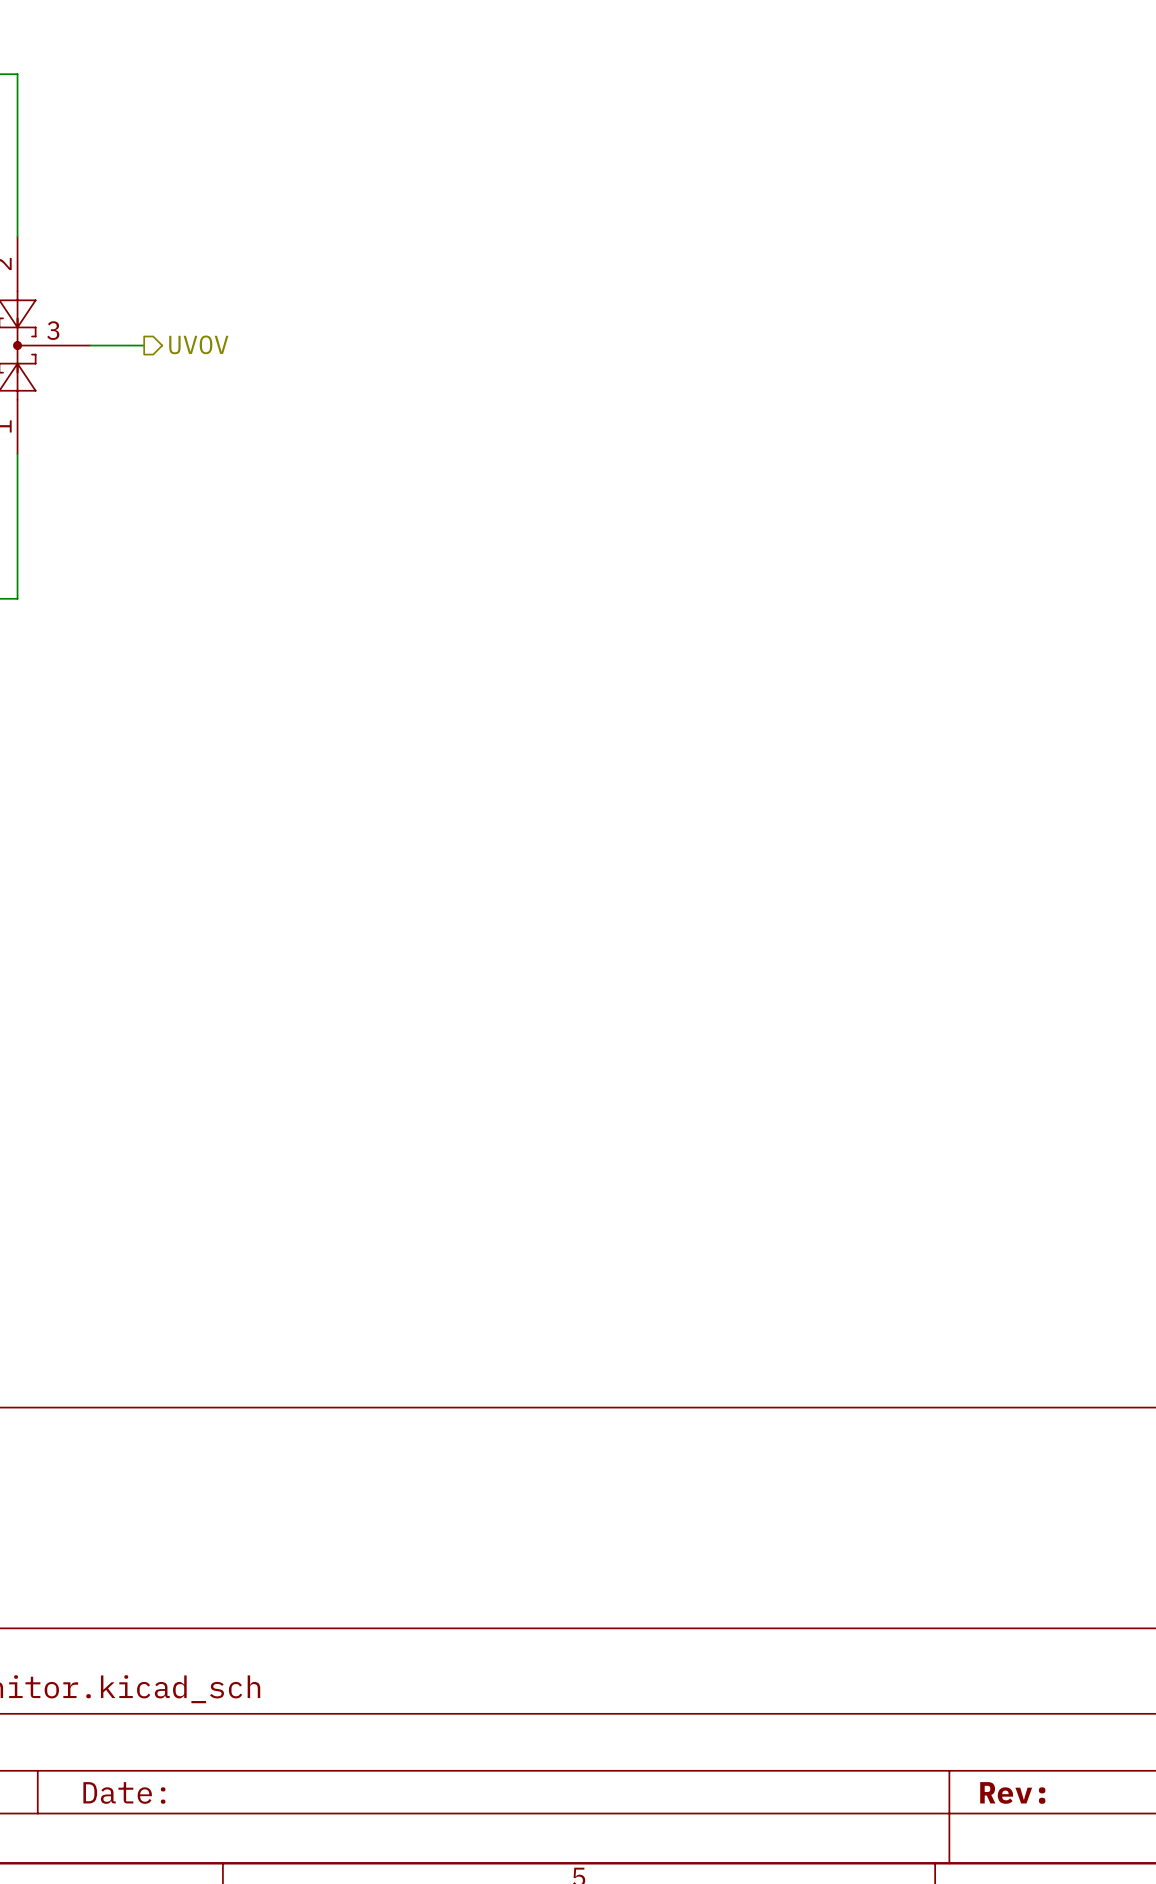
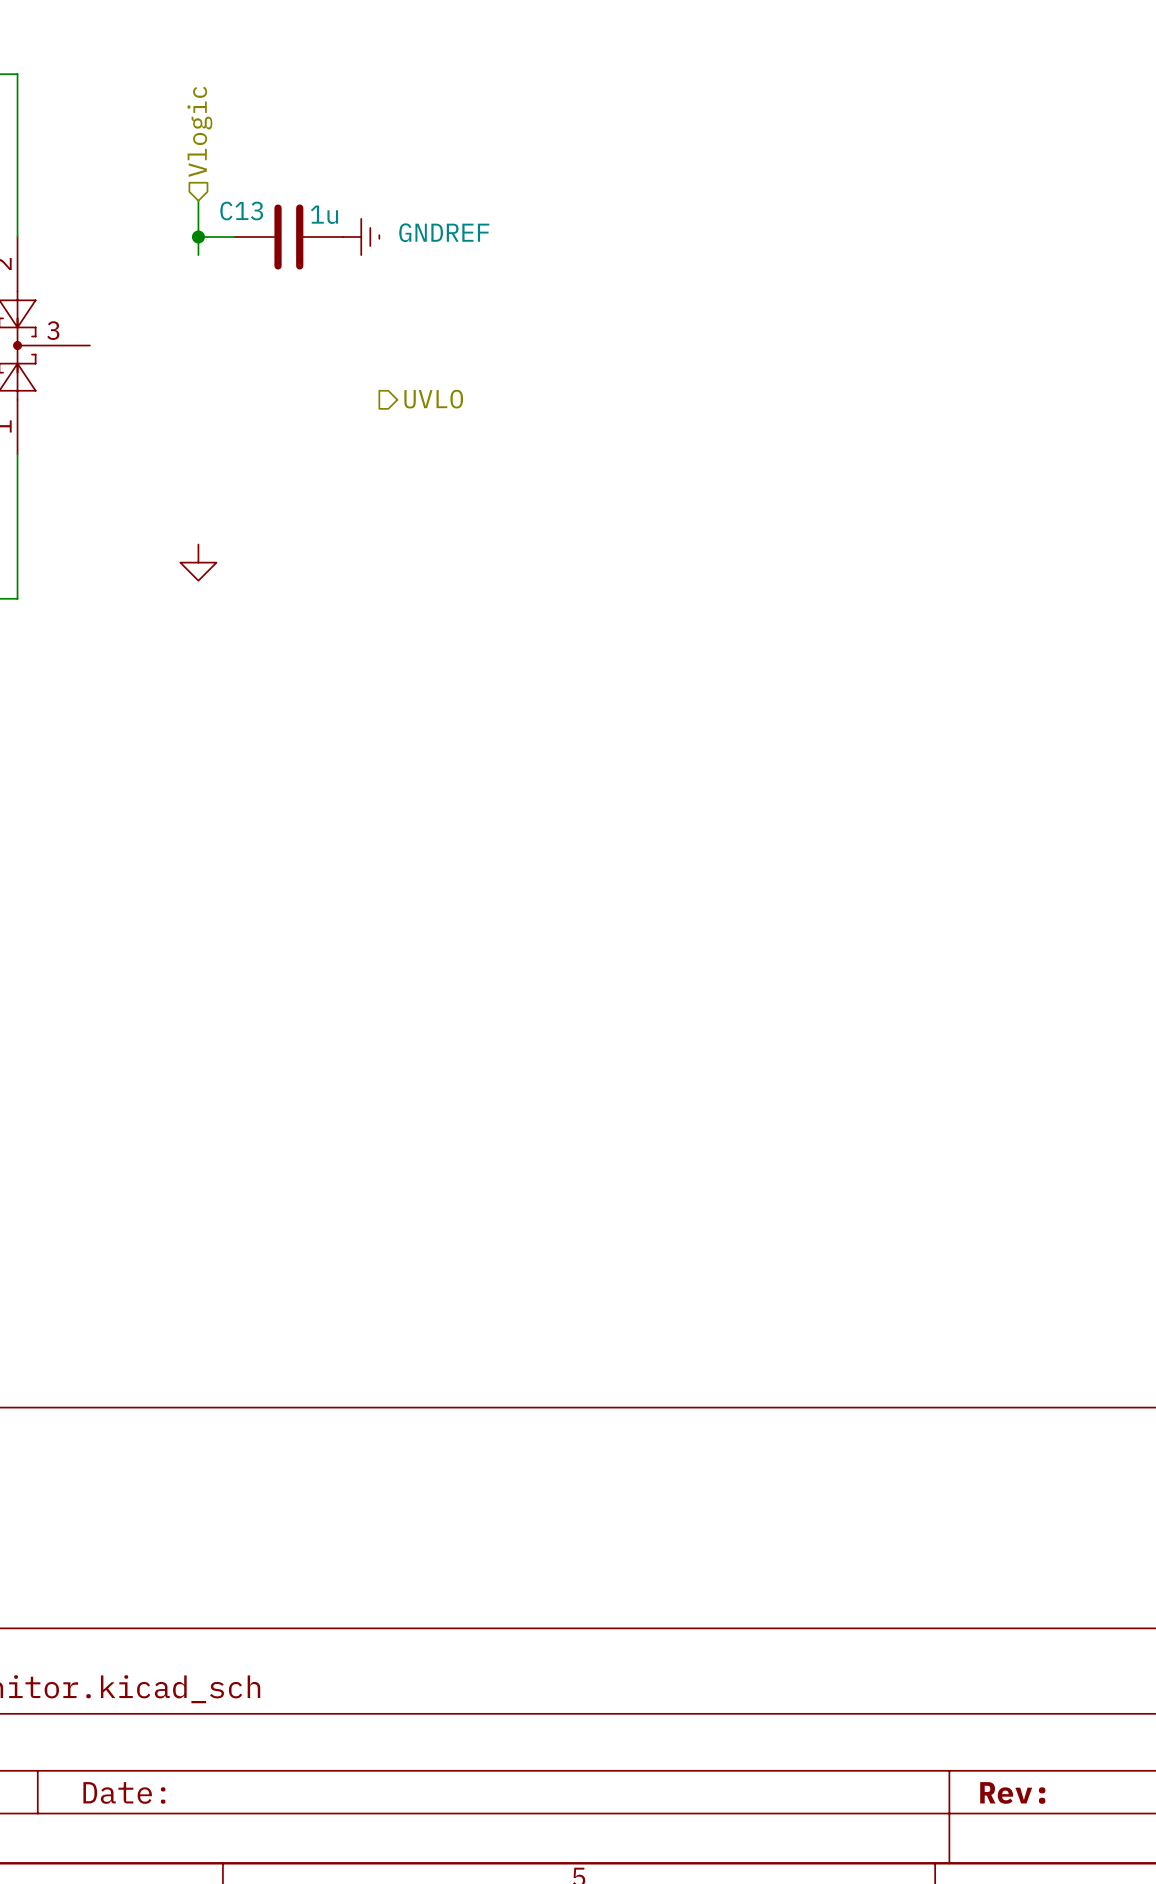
hierarchical label: none -> Vlogic (199, 131)
wire: none -> (198, 200) (198, 255)
wire: none -> (198, 237) (234, 237)
junction: none -> (198, 237)
C13: none -> 1u (288, 237)
power symbol: none -> GNDREF (361, 237)
hierarchical label: UVOV (198, 344) -> none
wire: (89, 345) (144, 345) -> none
hierarchical label: none -> UVLO (433, 399)
power symbol: none -> (198, 562)

